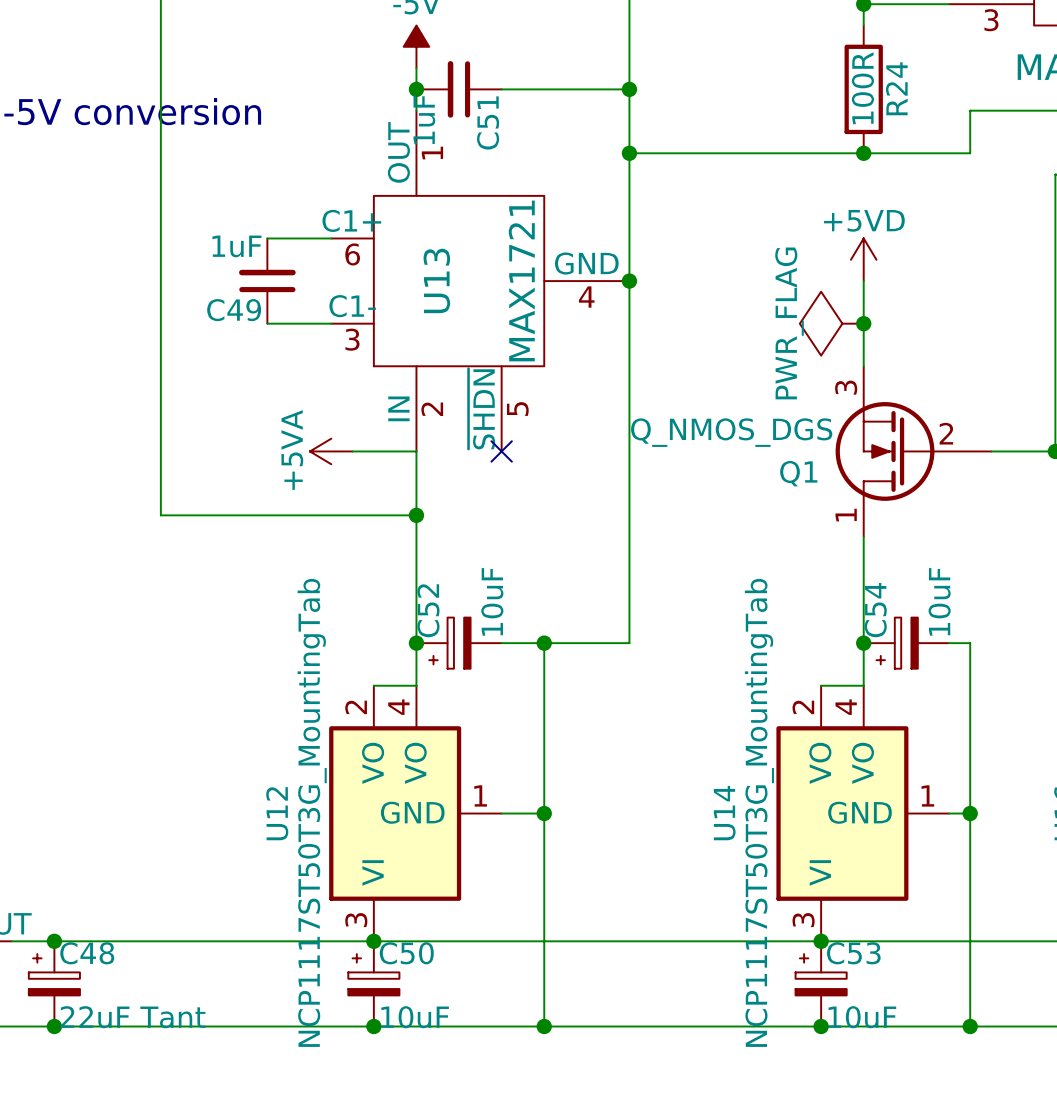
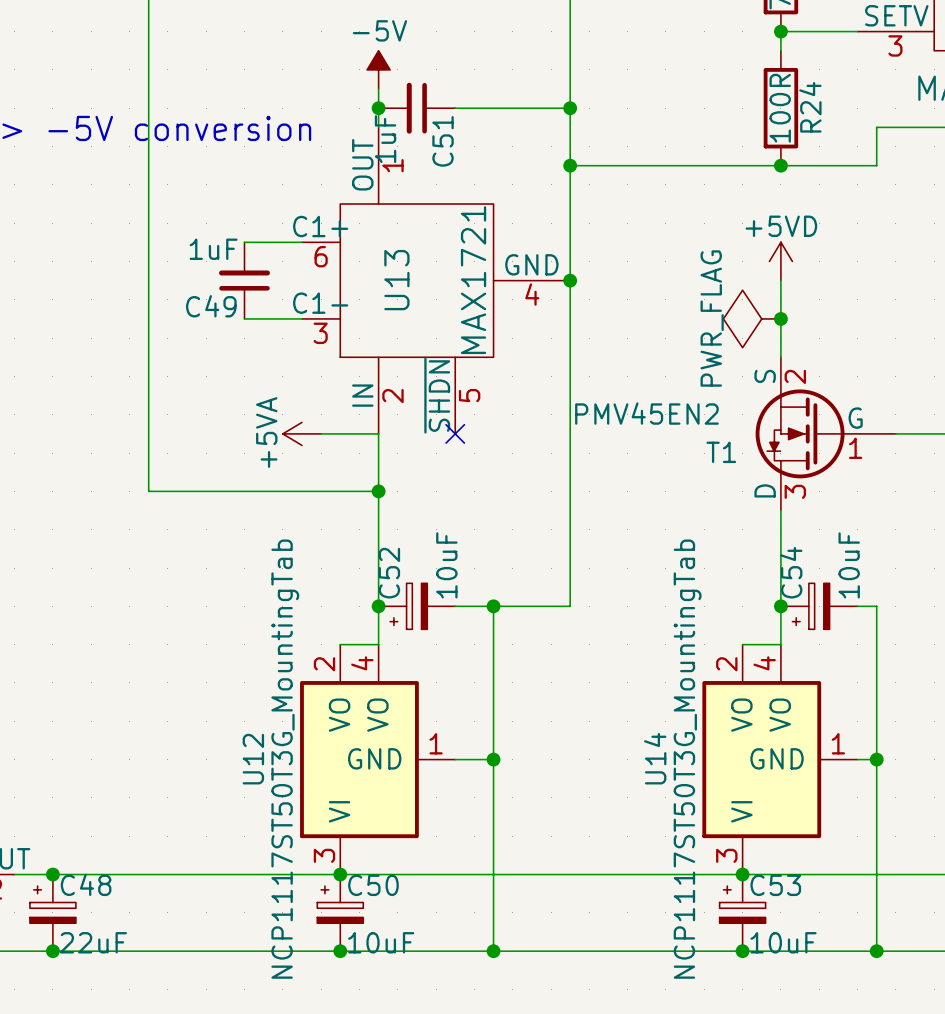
Q1: Q_NMOS_DGS (913, 451) -> none
T1: none -> PMV45EN2 (825, 433)
C48 value: 22uF Tant (133, 1017) -> 22uF (93, 942)

